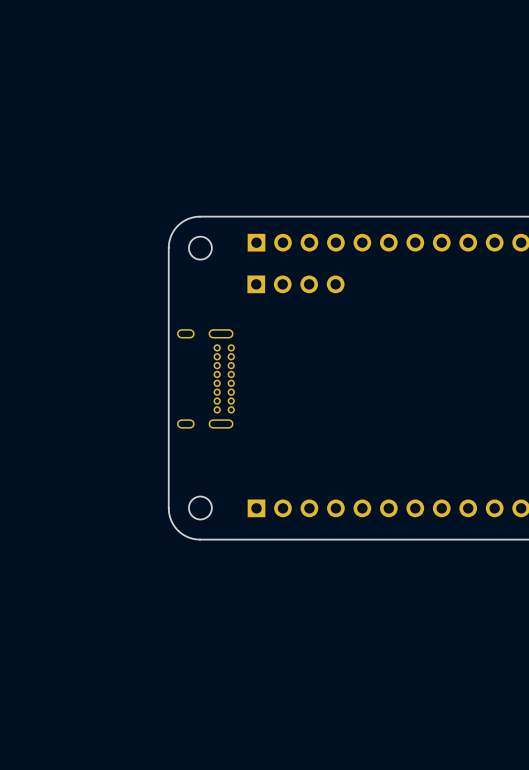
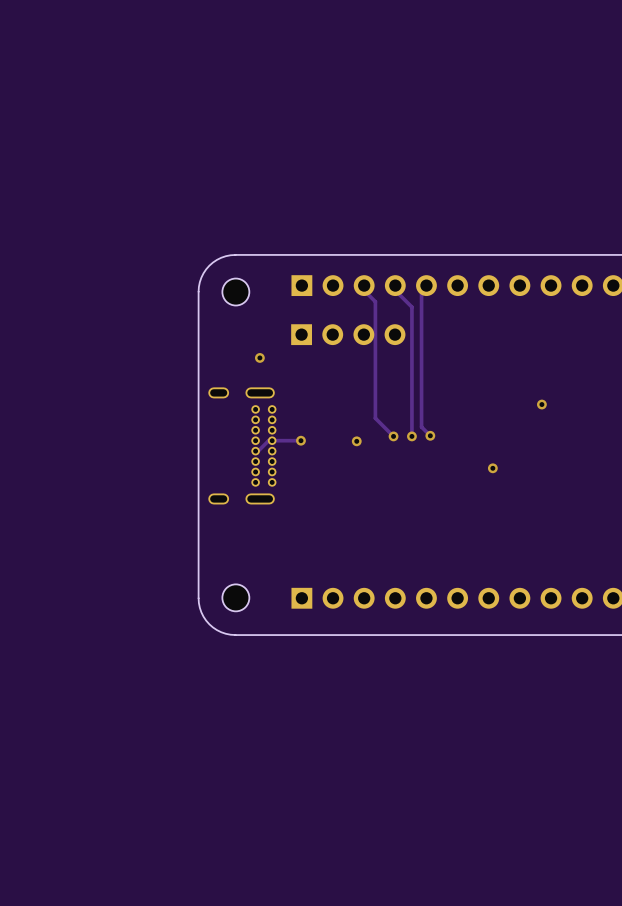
track: none -> (359, 285) (375, 301) (375, 418) (393, 436)
track: none -> (390, 285) (411, 307) (411, 436)
track: none -> (421, 285) (421, 427) (430, 435)
via: none -> (259, 357)
via: none -> (541, 404)
via: none -> (393, 436)
via: none -> (411, 436)
via: none -> (430, 435)
track: none -> (300, 440) (268, 440) (256, 451)
via: none -> (300, 440)
via: none -> (356, 441)
via: none -> (492, 468)

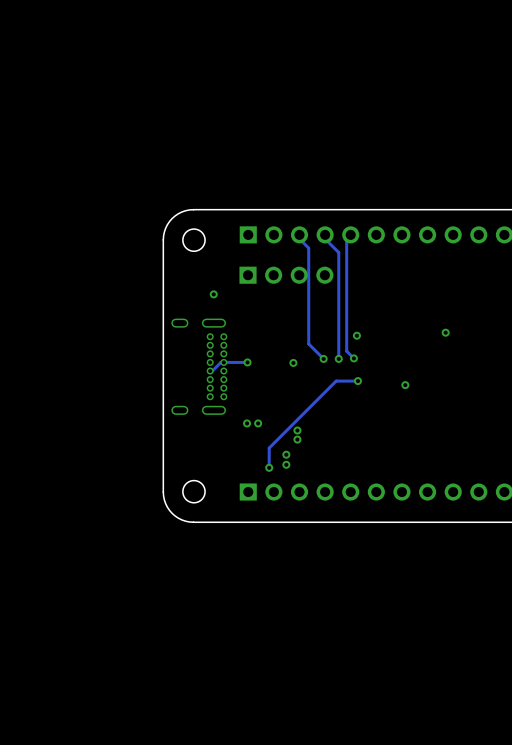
via: none -> (356, 335)
track: none -> (357, 381) (336, 381) (269, 448) (269, 467)
via: none -> (357, 381)
via: none -> (247, 423)
via: none -> (258, 423)
via: none -> (297, 430)
via: none -> (297, 439)
via: none -> (286, 454)
via: none -> (286, 464)
via: none -> (269, 467)

